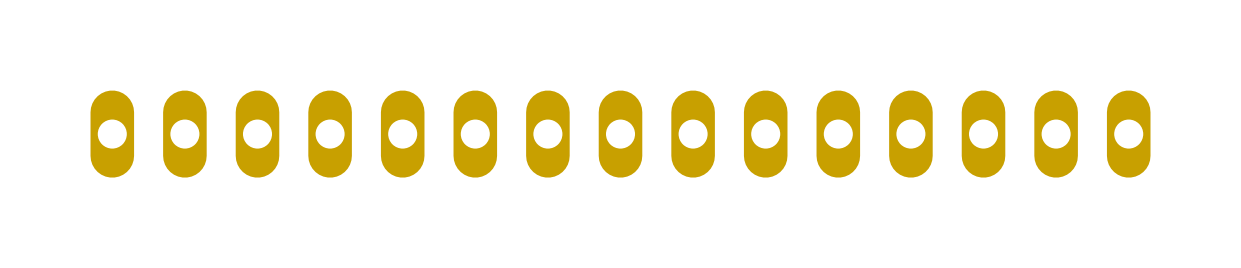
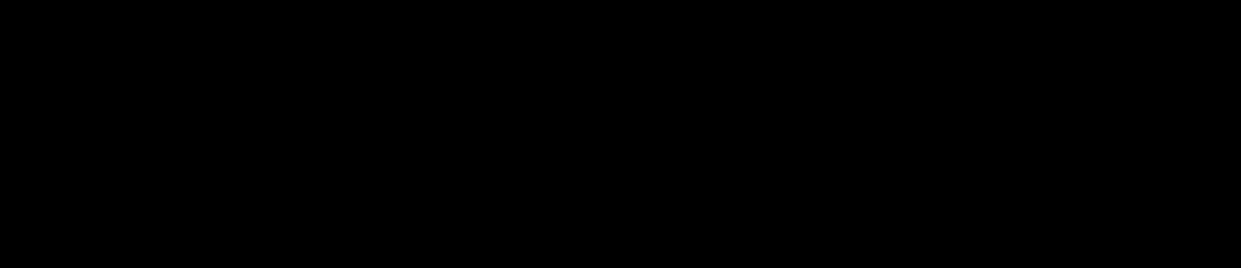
part: (620, 134) -> none

